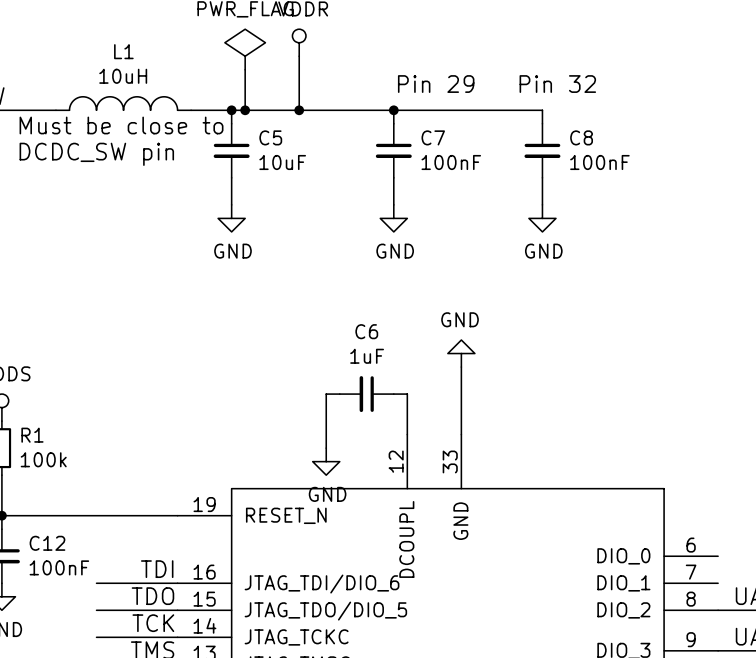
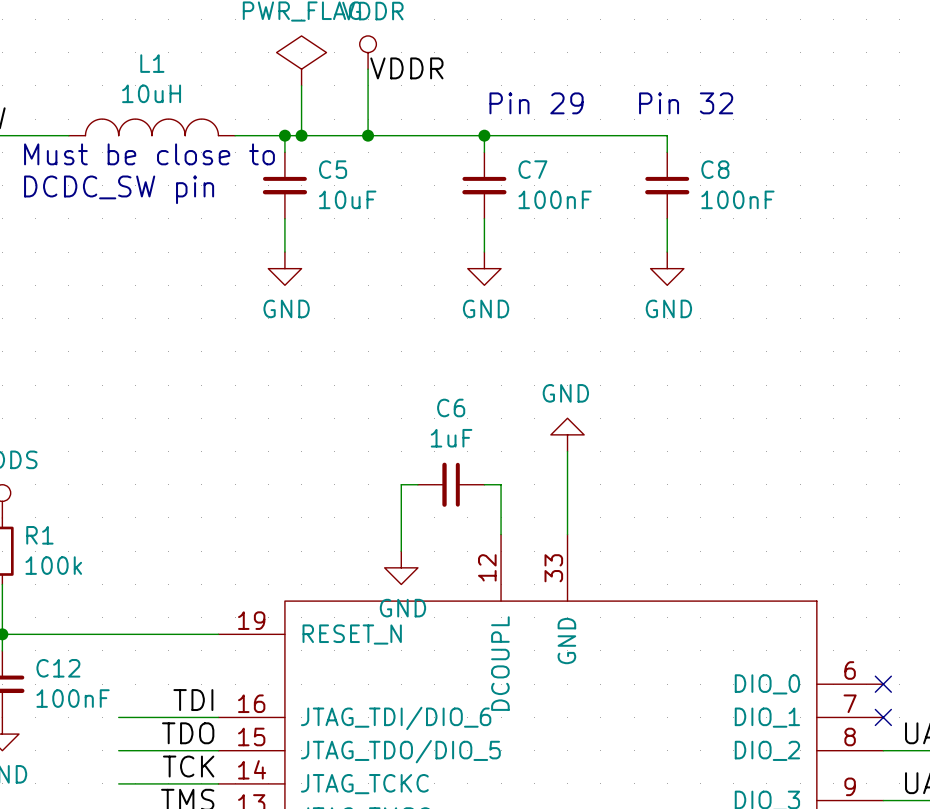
label: none -> VDDR (406, 68)
no-connect mark: none -> (883, 684)
no-connect mark: none -> (883, 717)

